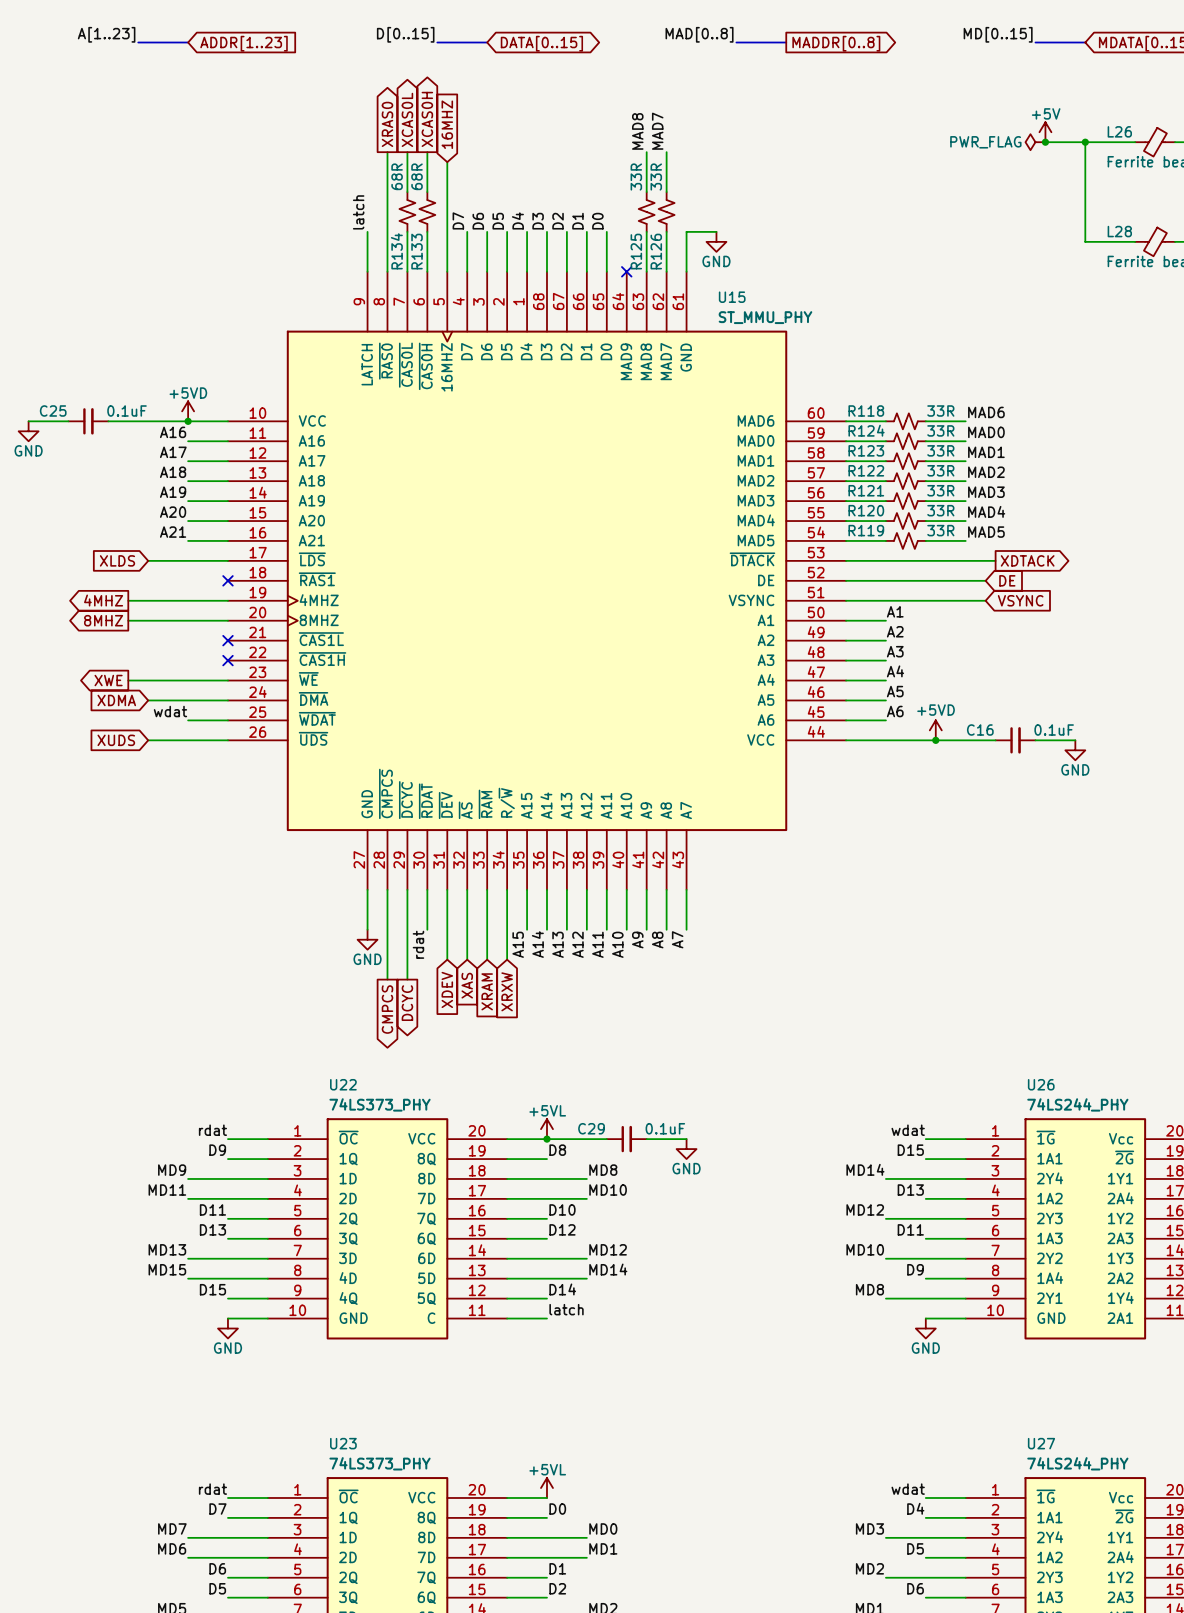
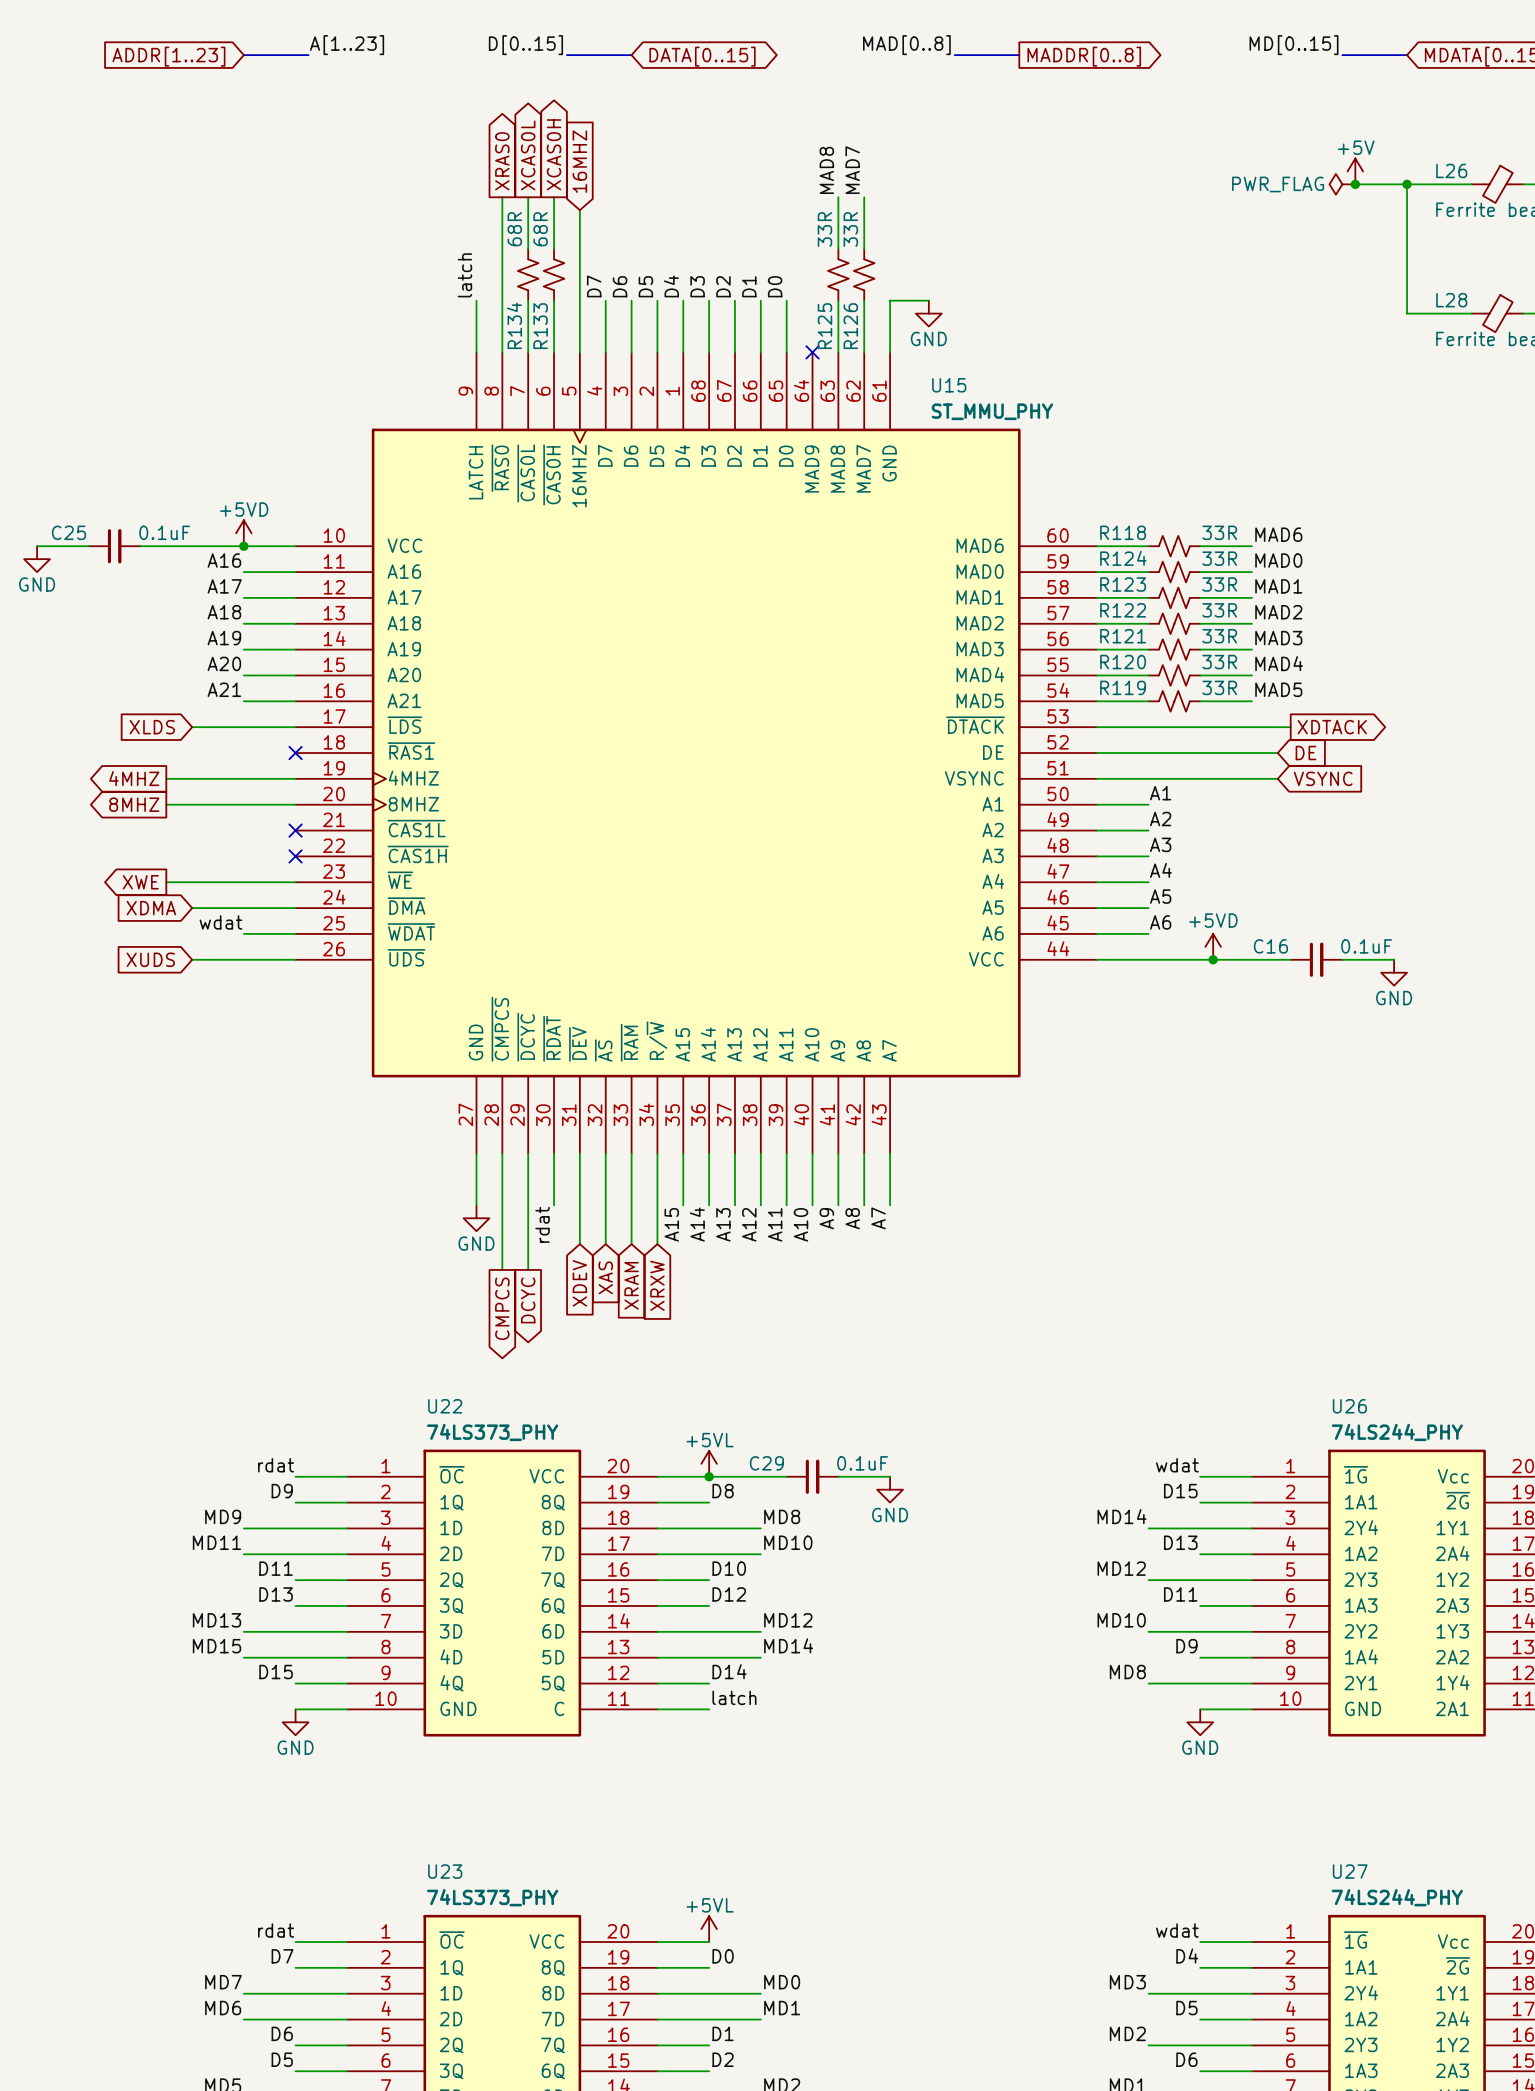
label position: A[1..23] (106, 34) -> A[1..23] (347, 45)
bus: (138, 42) (188, 42) -> (308, 55) (243, 55)
global label rotation: 0° (244, 43) -> 180° (168, 56)

